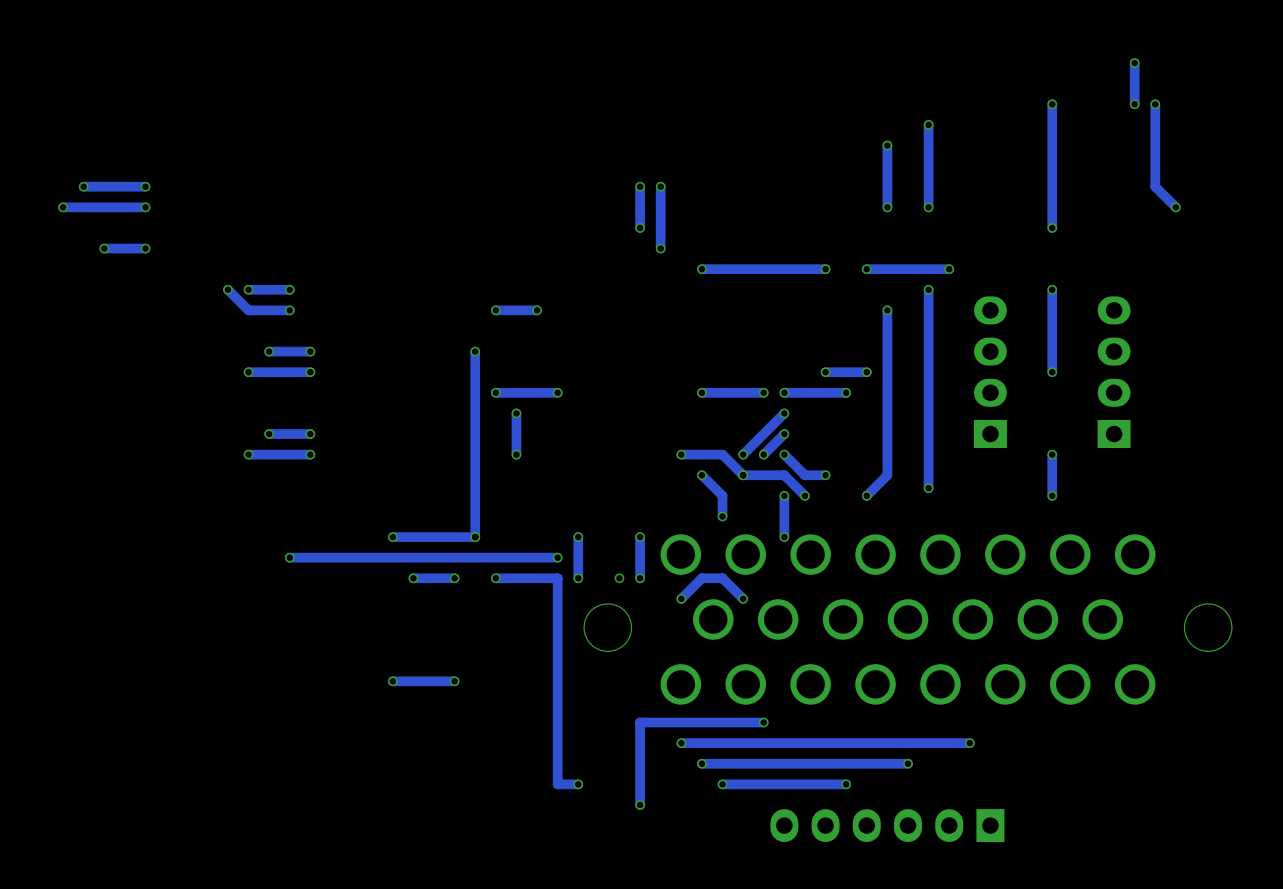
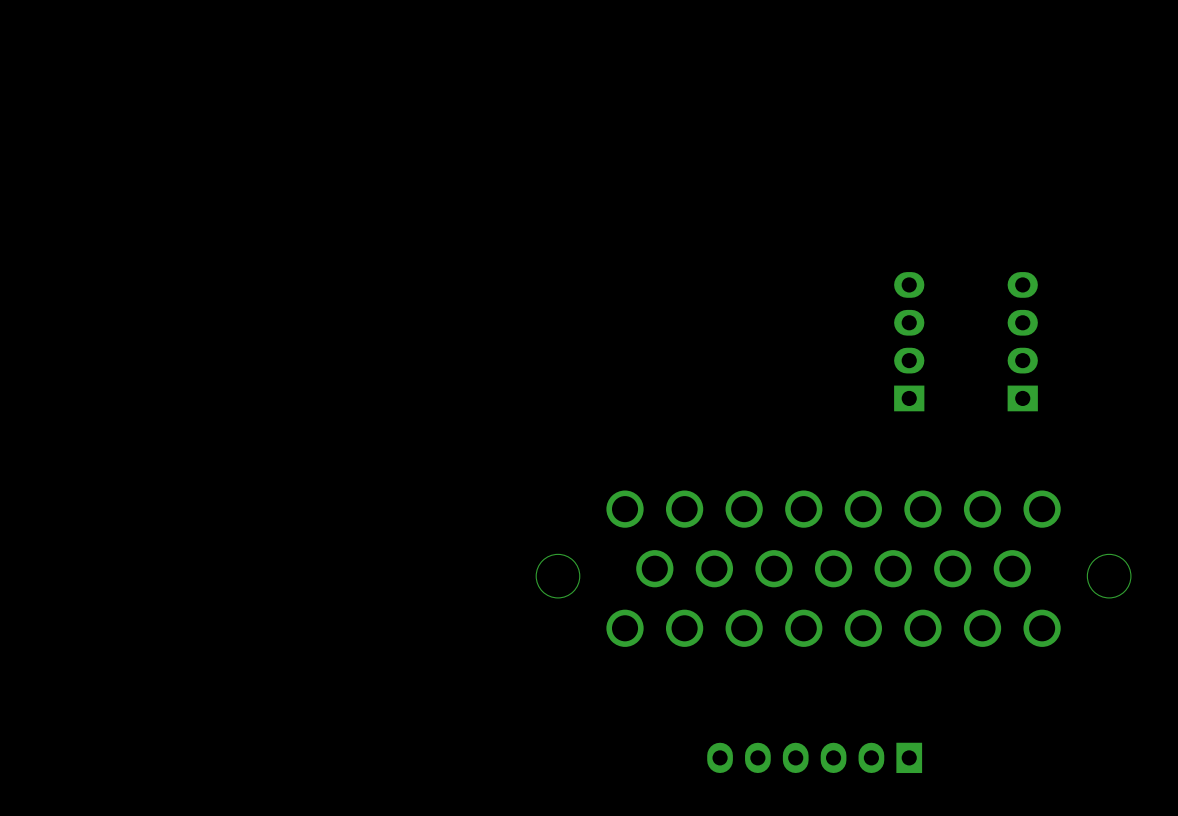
track: (1134, 63) (1134, 104) -> none
via: (1134, 63) -> none
track: (1052, 104) (1052, 227) -> none
via: (1052, 104) -> none
via: (1134, 104) -> none
track: (1155, 104) (1155, 186) (1175, 207) -> none
via: (1155, 104) -> none
track: (928, 124) (928, 207) -> none
via: (928, 124) -> none
track: (887, 145) (887, 207) -> none
via: (887, 145) -> none
via: (83, 186) -> none
track: (145, 186) (83, 186) -> none
via: (145, 186) -> none
track: (640, 186) (640, 227) -> none
via: (640, 186) -> none
track: (660, 186) (660, 248) -> none
via: (660, 186) -> none
via: (63, 207) -> none
track: (145, 207) (63, 207) -> none
via: (145, 207) -> none
via: (887, 207) -> none
via: (928, 207) -> none
via: (1175, 207) -> none
via: (640, 227) -> none
via: (1052, 227) -> none
via: (104, 248) -> none
track: (145, 248) (104, 248) -> none
via: (145, 248) -> none
via: (660, 248) -> none
via: (701, 269) -> none
track: (825, 269) (701, 269) -> none
via: (825, 269) -> none
via: (866, 269) -> none
track: (949, 269) (866, 269) -> none
via: (949, 269) -> none
track: (227, 289) (248, 310) (289, 310) -> none
via: (227, 289) -> none
via: (248, 289) -> none
track: (289, 289) (248, 289) -> none
via: (289, 289) -> none
track: (928, 289) (928, 488) -> none
via: (928, 289) -> none
track: (1052, 289) (1052, 372) -> none
via: (1052, 289) -> none
via: (289, 310) -> none
via: (495, 310) -> none
track: (537, 310) (495, 310) -> none
via: (537, 310) -> none
track: (887, 310) (887, 475) (866, 495) -> none
via: (887, 310) -> none
via: (269, 351) -> none
track: (310, 351) (269, 351) -> none
via: (310, 351) -> none
track: (475, 351) (475, 537) (392, 537) -> none
via: (475, 351) -> none
via: (248, 372) -> none
track: (310, 372) (248, 372) -> none
via: (310, 372) -> none
via: (825, 372) -> none
track: (866, 372) (825, 372) -> none
via: (866, 372) -> none
via: (1052, 372) -> none
via: (495, 392) -> none
track: (557, 392) (495, 392) -> none
via: (557, 392) -> none
via: (701, 392) -> none
track: (763, 392) (701, 392) -> none
via: (763, 392) -> none
via: (784, 392) -> none
track: (846, 392) (784, 392) -> none
via: (846, 392) -> none
track: (516, 413) (516, 454) -> none
via: (516, 413) -> none
track: (784, 413) (743, 454) -> none
via: (784, 413) -> none
via: (269, 434) -> none
track: (310, 434) (269, 434) -> none
via: (310, 434) -> none
track: (784, 434) (763, 454) -> none
via: (784, 434) -> none
via: (248, 454) -> none
track: (310, 454) (248, 454) -> none
via: (310, 454) -> none
via: (516, 454) -> none
track: (681, 454) (722, 454) (743, 475) (784, 475) (804, 495) -> none
via: (681, 454) -> none
via: (743, 454) -> none
via: (763, 454) -> none
track: (784, 454) (804, 475) (825, 475) -> none
via: (784, 454) -> none
track: (1052, 454) (1052, 495) -> none
via: (1052, 454) -> none
track: (701, 475) (722, 495) (722, 516) -> none
via: (701, 475) -> none
via: (743, 475) -> none
via: (825, 475) -> none
via: (928, 488) -> none
track: (784, 495) (784, 537) -> none
via: (784, 495) -> none
via: (804, 495) -> none
via: (866, 495) -> none
via: (1052, 495) -> none
via: (722, 516) -> none
via: (392, 537) -> none
via: (475, 537) -> none
track: (578, 537) (578, 578) -> none
via: (578, 537) -> none
track: (640, 537) (640, 578) -> none
via: (640, 537) -> none
via: (784, 537) -> none
via: (289, 557) -> none
track: (557, 557) (289, 557) -> none
via: (557, 557) -> none
via: (413, 578) -> none
track: (454, 578) (413, 578) -> none
via: (454, 578) -> none
track: (495, 578) (557, 578) (557, 784) (578, 784) -> none
via: (495, 578) -> none
via: (578, 578) -> none
via: (619, 578) -> none
via: (640, 578) -> none
via: (681, 598) -> none
track: (743, 598) (722, 578) (701, 578) (681, 598) -> none
via: (743, 598) -> none
via: (392, 681) -> none
track: (454, 681) (392, 681) -> none
via: (454, 681) -> none
track: (763, 722) (640, 722) (640, 804) -> none
via: (763, 722) -> none
via: (681, 743) -> none
track: (969, 743) (681, 743) -> none
via: (969, 743) -> none
via: (701, 763) -> none
track: (908, 763) (701, 763) -> none
via: (908, 763) -> none
via: (578, 784) -> none
via: (722, 784) -> none
track: (846, 784) (722, 784) -> none
via: (846, 784) -> none
via: (640, 804) -> none

